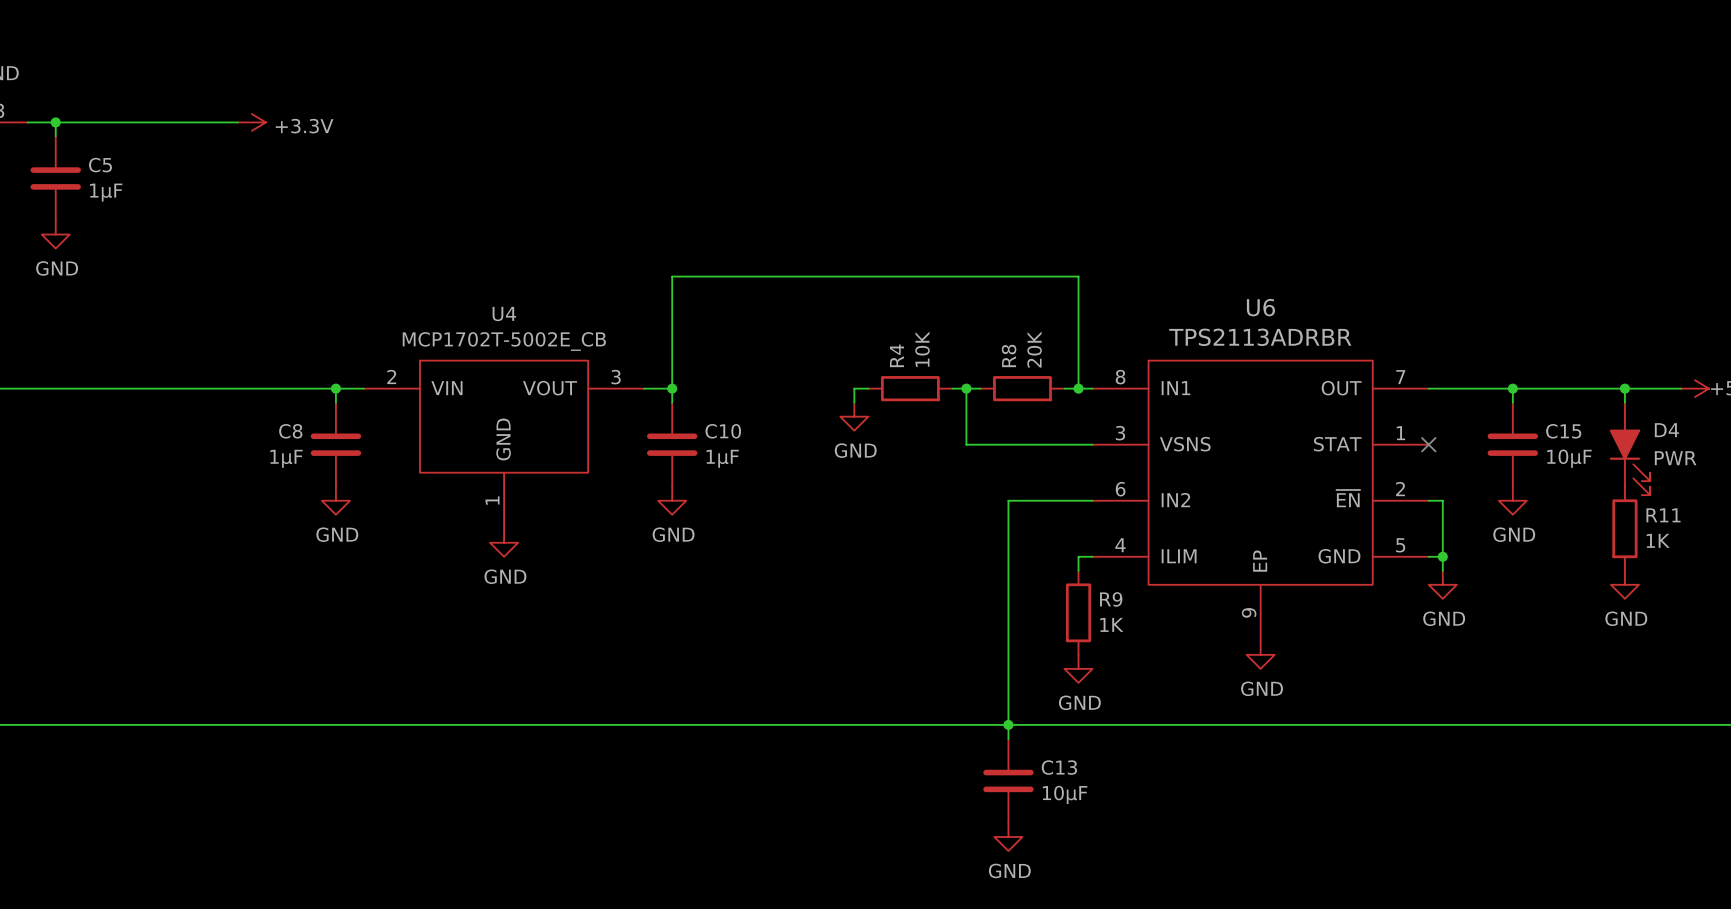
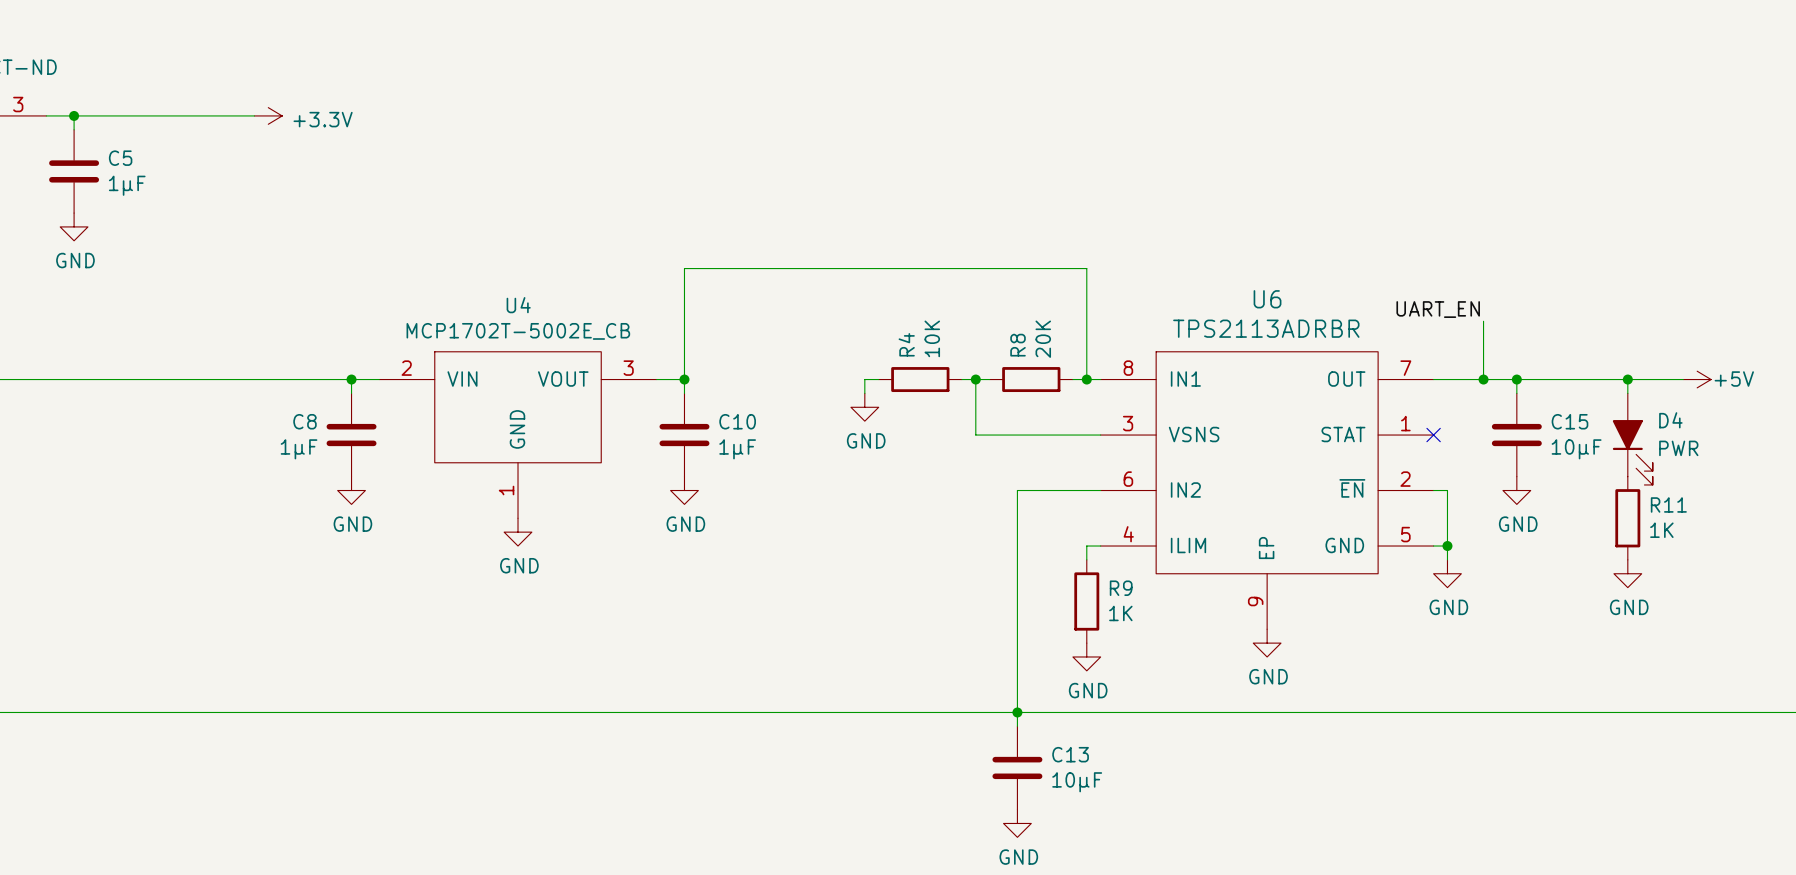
label: none -> UART_EN (1438, 309)
wire: none -> (1483, 321) (1483, 379)
junction: none -> (1483, 379)

